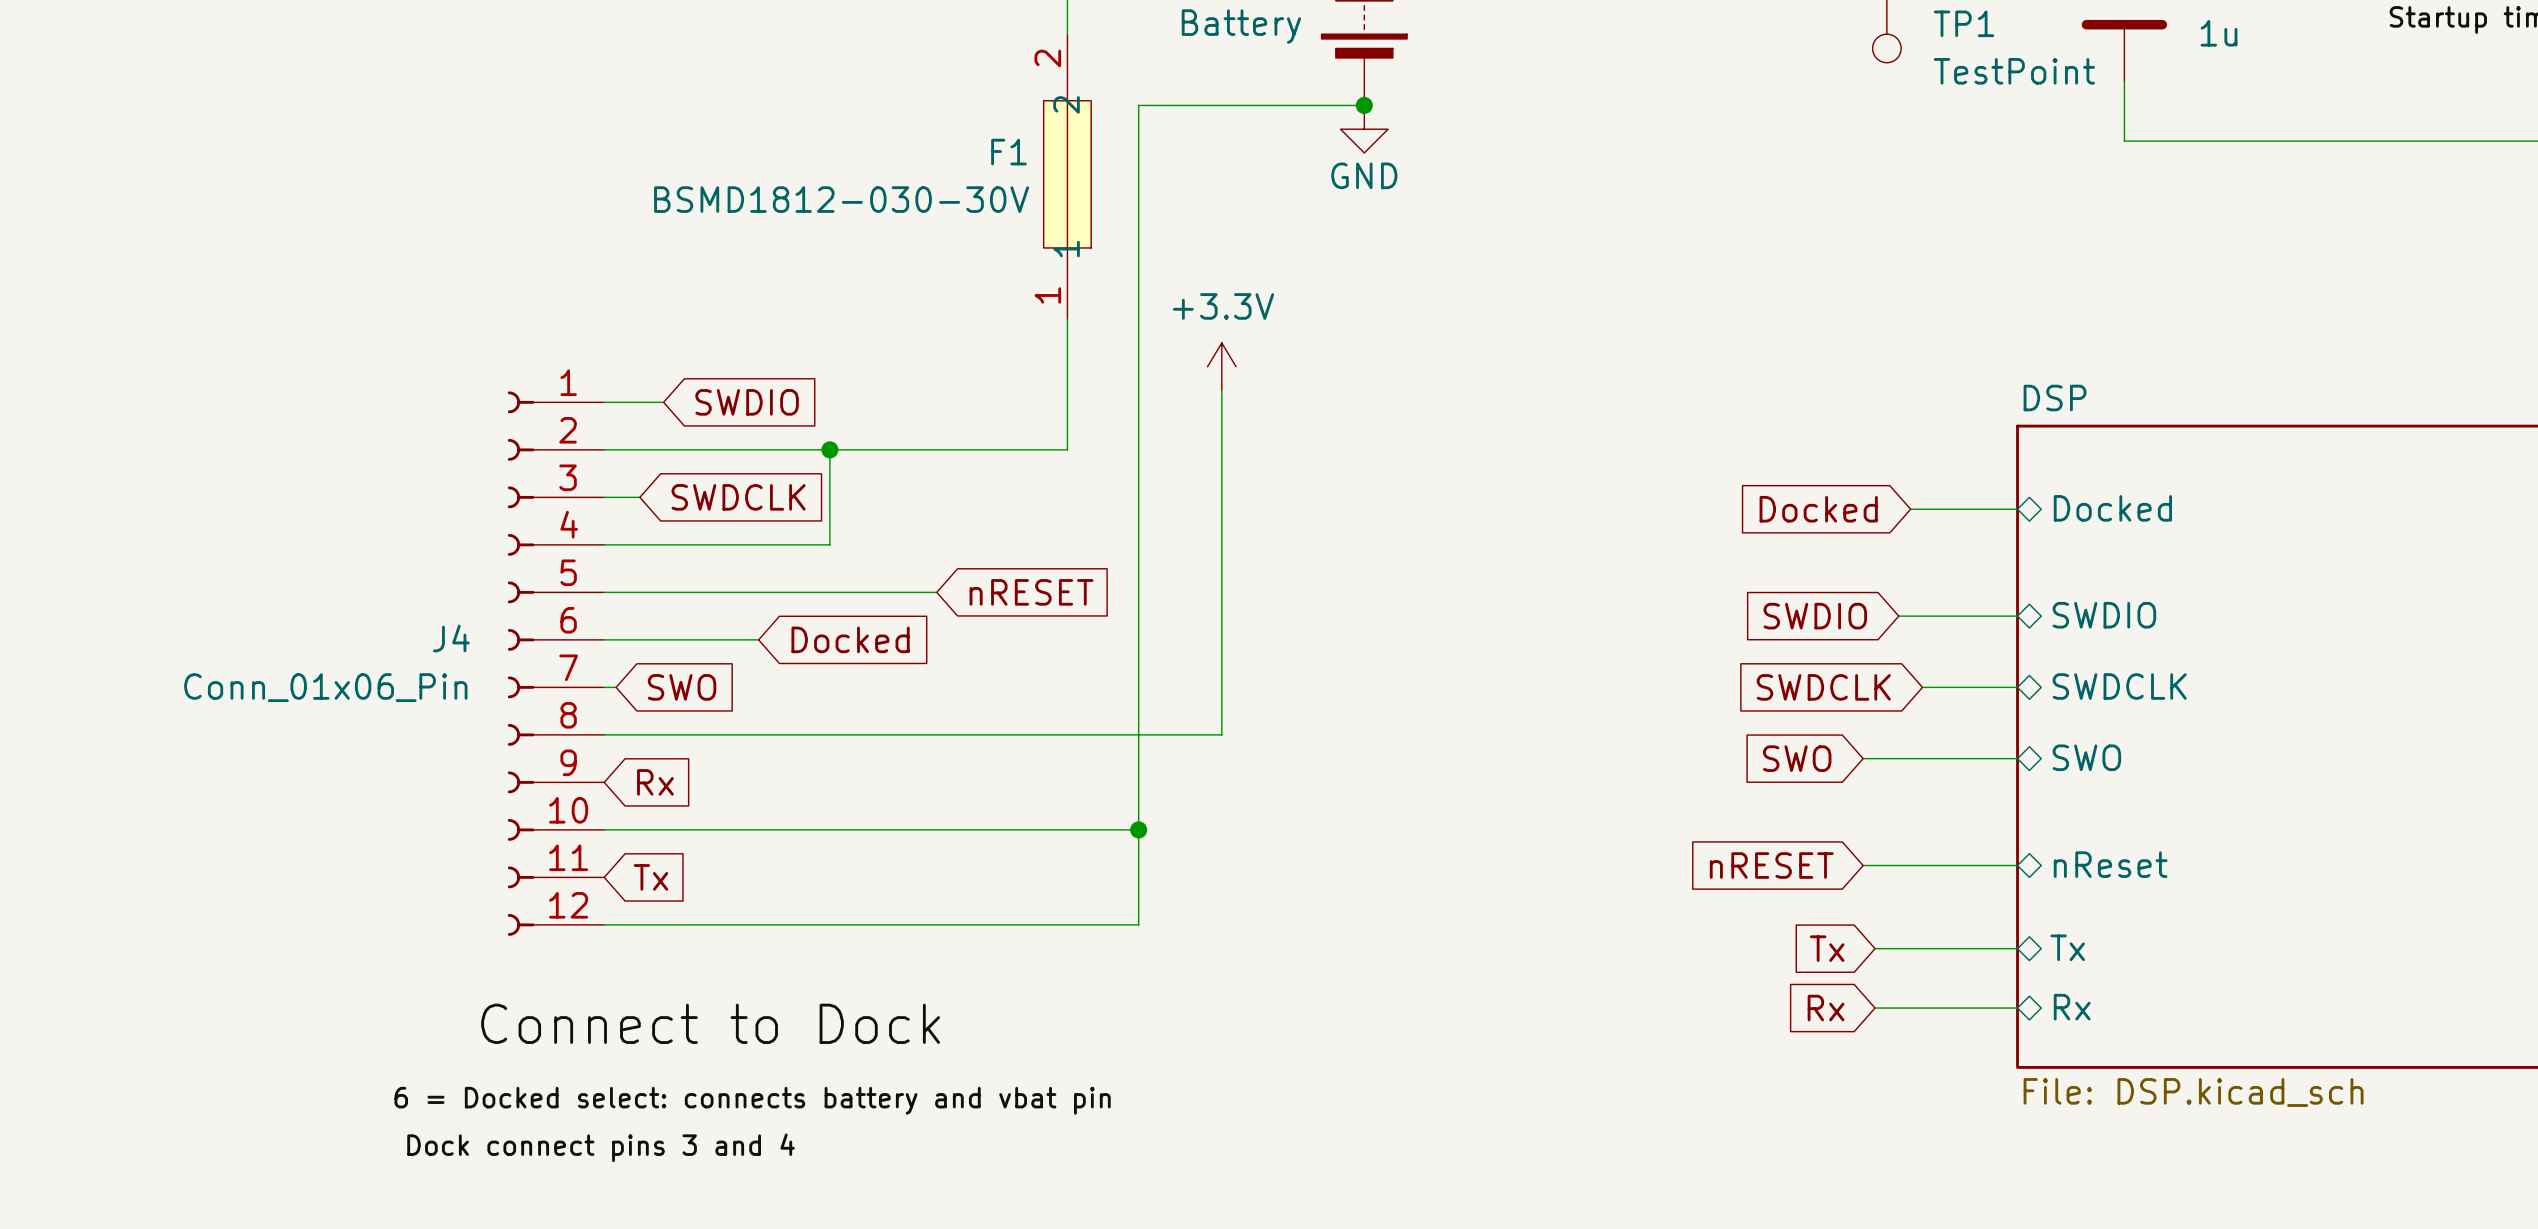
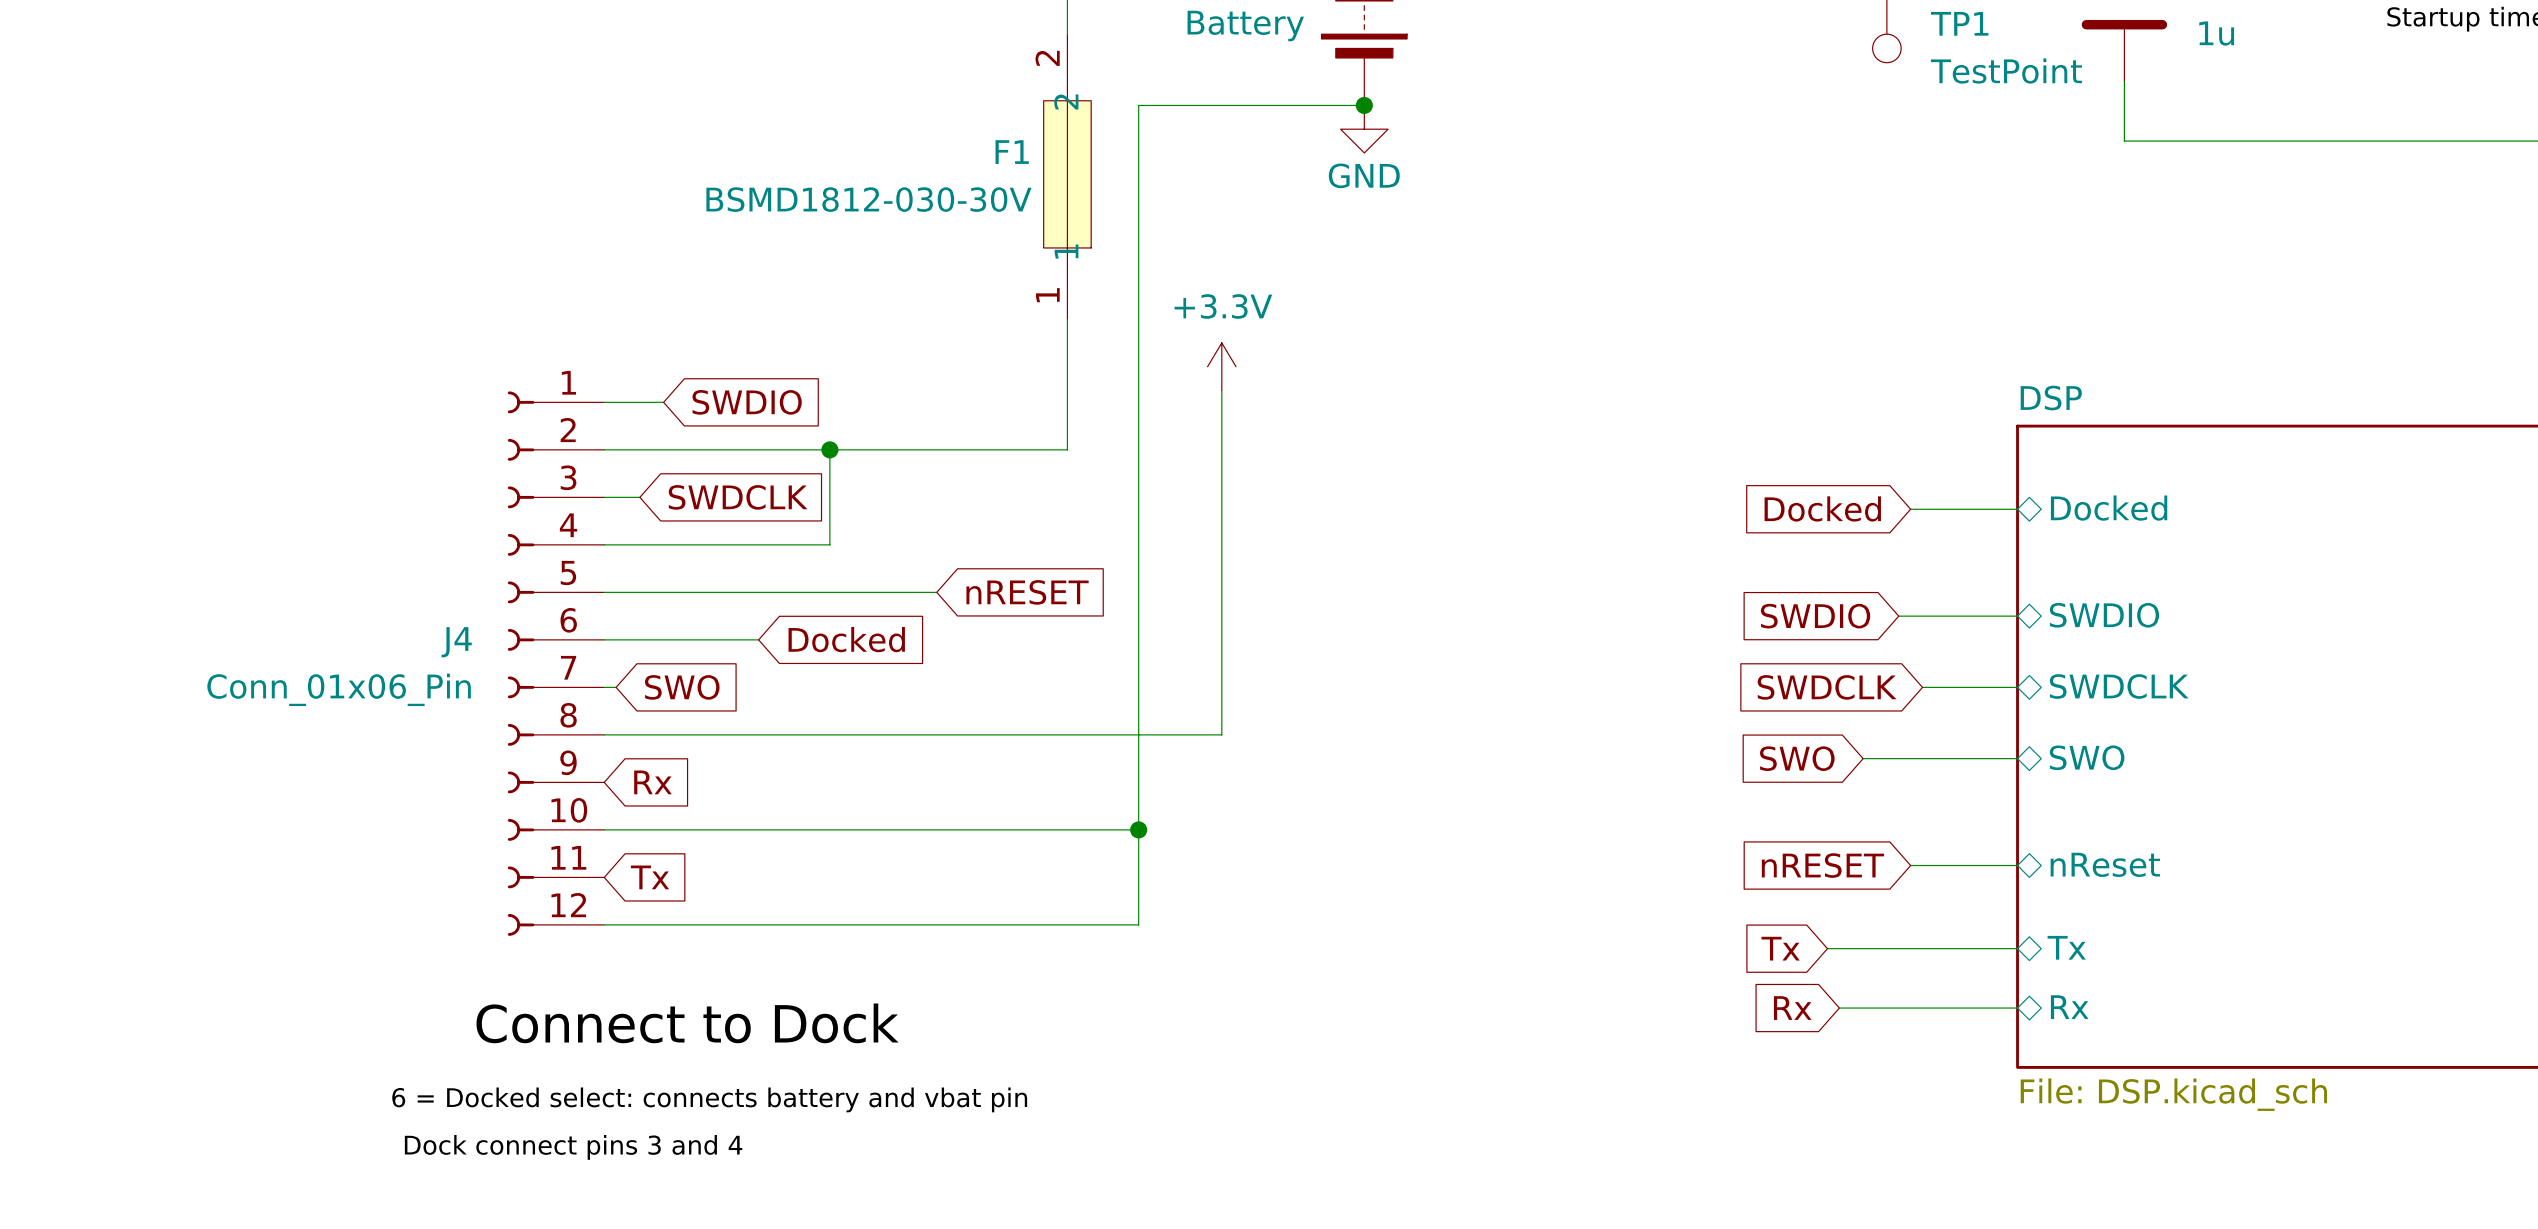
global label position: nRESET (1771, 865) -> nRESET (1822, 865)
wire: (1863, 865) (1910, 865) -> (1827, 948) (1875, 948)
global label position: Tx (1827, 948) -> Tx (1780, 948)
global label position: Rx (1826, 1008) -> Rx (1792, 1008)
wire: none -> (1839, 1008) (1875, 1008)

